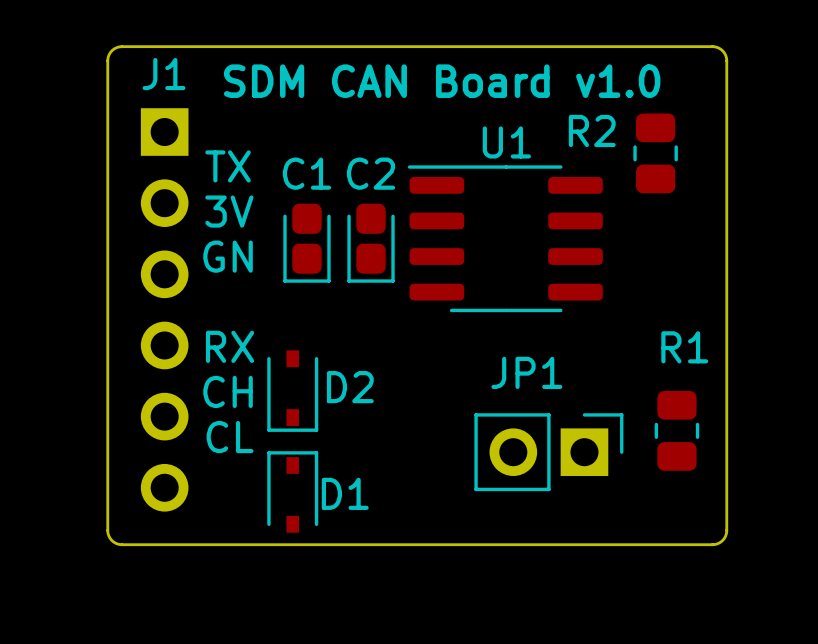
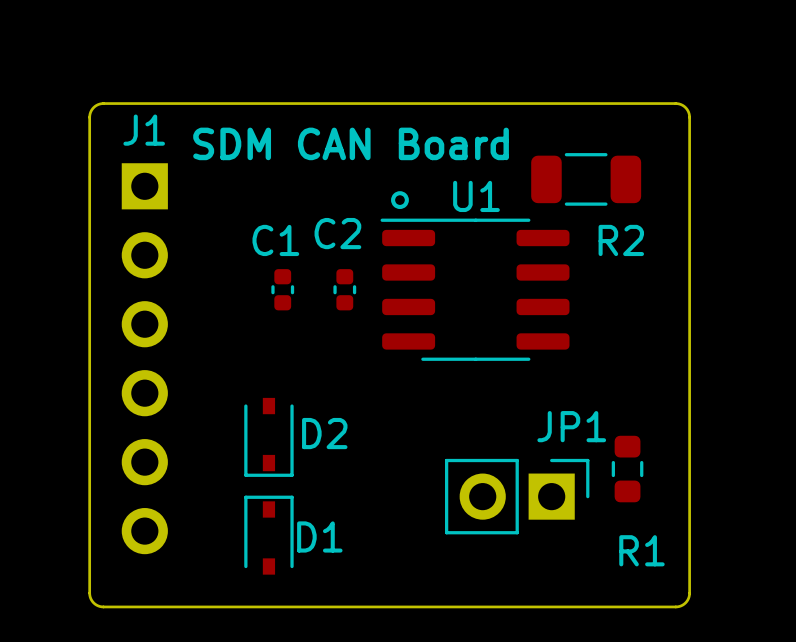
text: SDM CAN Board v1.0 (442, 81) -> SDM CAN Board (351, 143)
R2 footprint: [633, 113, 678, 194] -> [531, 153, 642, 206]
R2 name position: R2 (592, 130) -> R2 (621, 240)
drawing: none -> [391, 191, 409, 210]
text: TX (228, 166) -> none
C1 footprint: [283, 203, 331, 283] -> [271, 269, 295, 311]
C2 footprint: [347, 203, 395, 283] -> [333, 269, 357, 311]
text: 3V (229, 211) -> none
text: GN (228, 256) -> none
text: RX (230, 346) -> none
R1 name position: R1 (684, 347) -> R1 (641, 550)
JP1 name position: JP1 (526, 372) -> JP1 (571, 426)
R1 footprint: [654, 390, 700, 471] -> [611, 435, 644, 503]
text: CH (228, 391) -> none
text: CL (230, 437) -> none
board edge: (107, 530) (111, 540) (121, 544) (712, 544) (722, 540) (726, 530) -> (89, 572) (90, 598) (96, 605) (103, 606) (675, 606) (684, 604) (688, 598) (689, 572)

